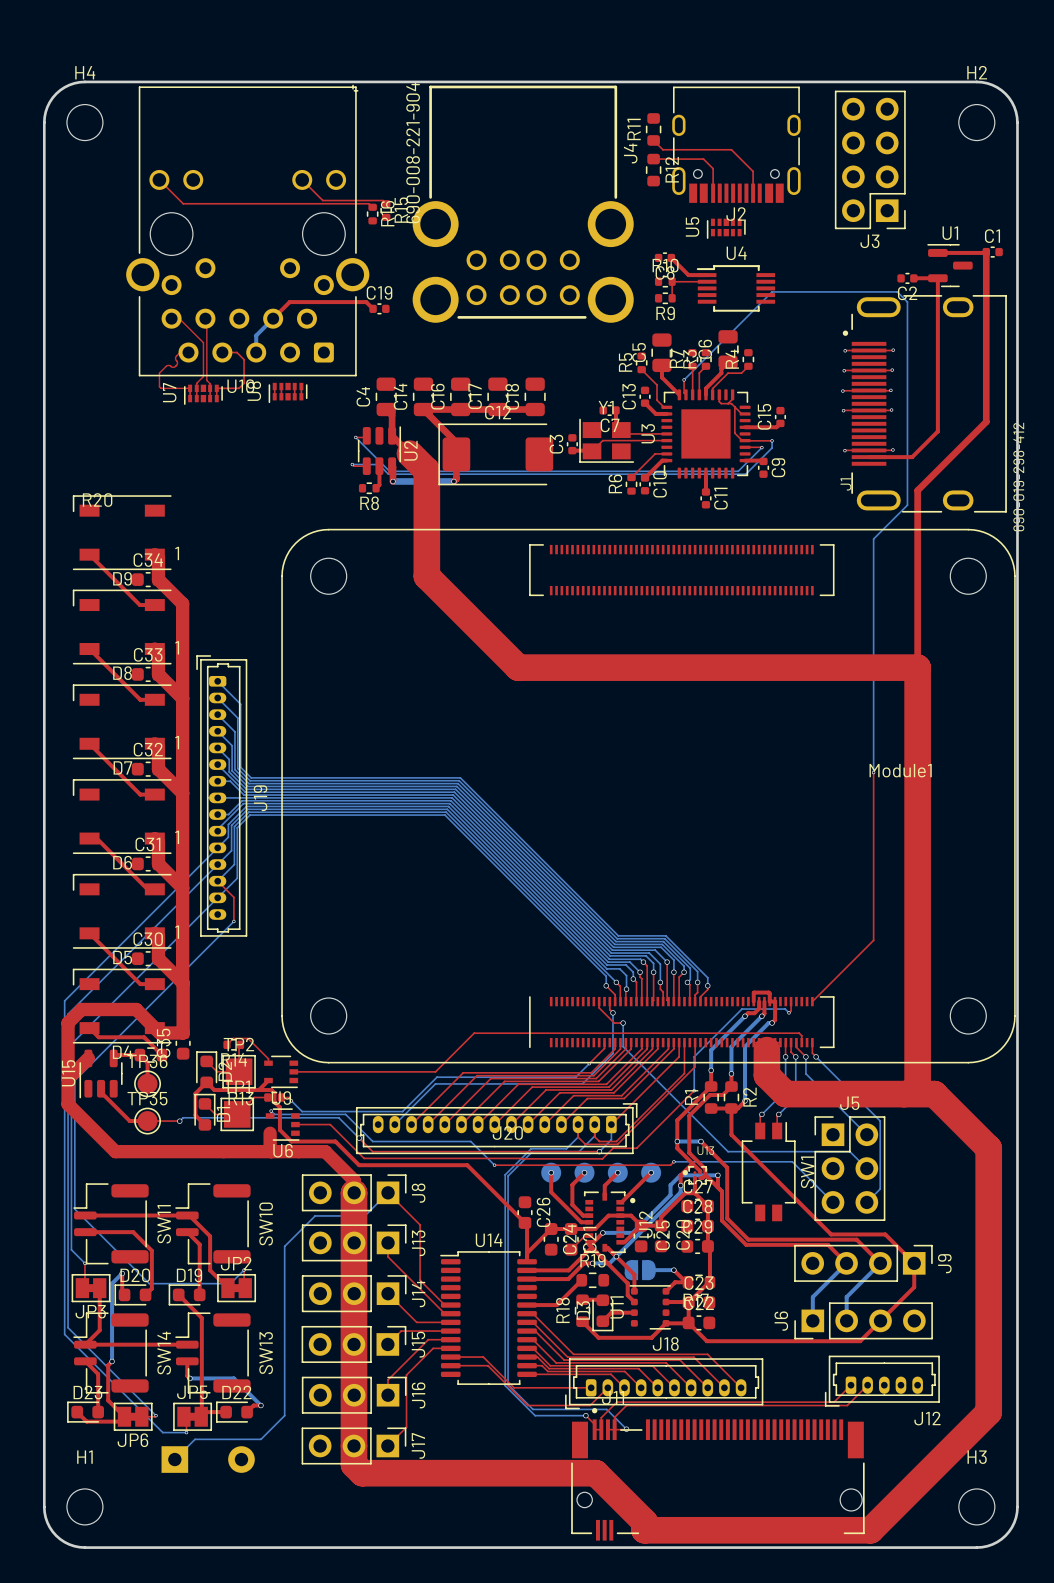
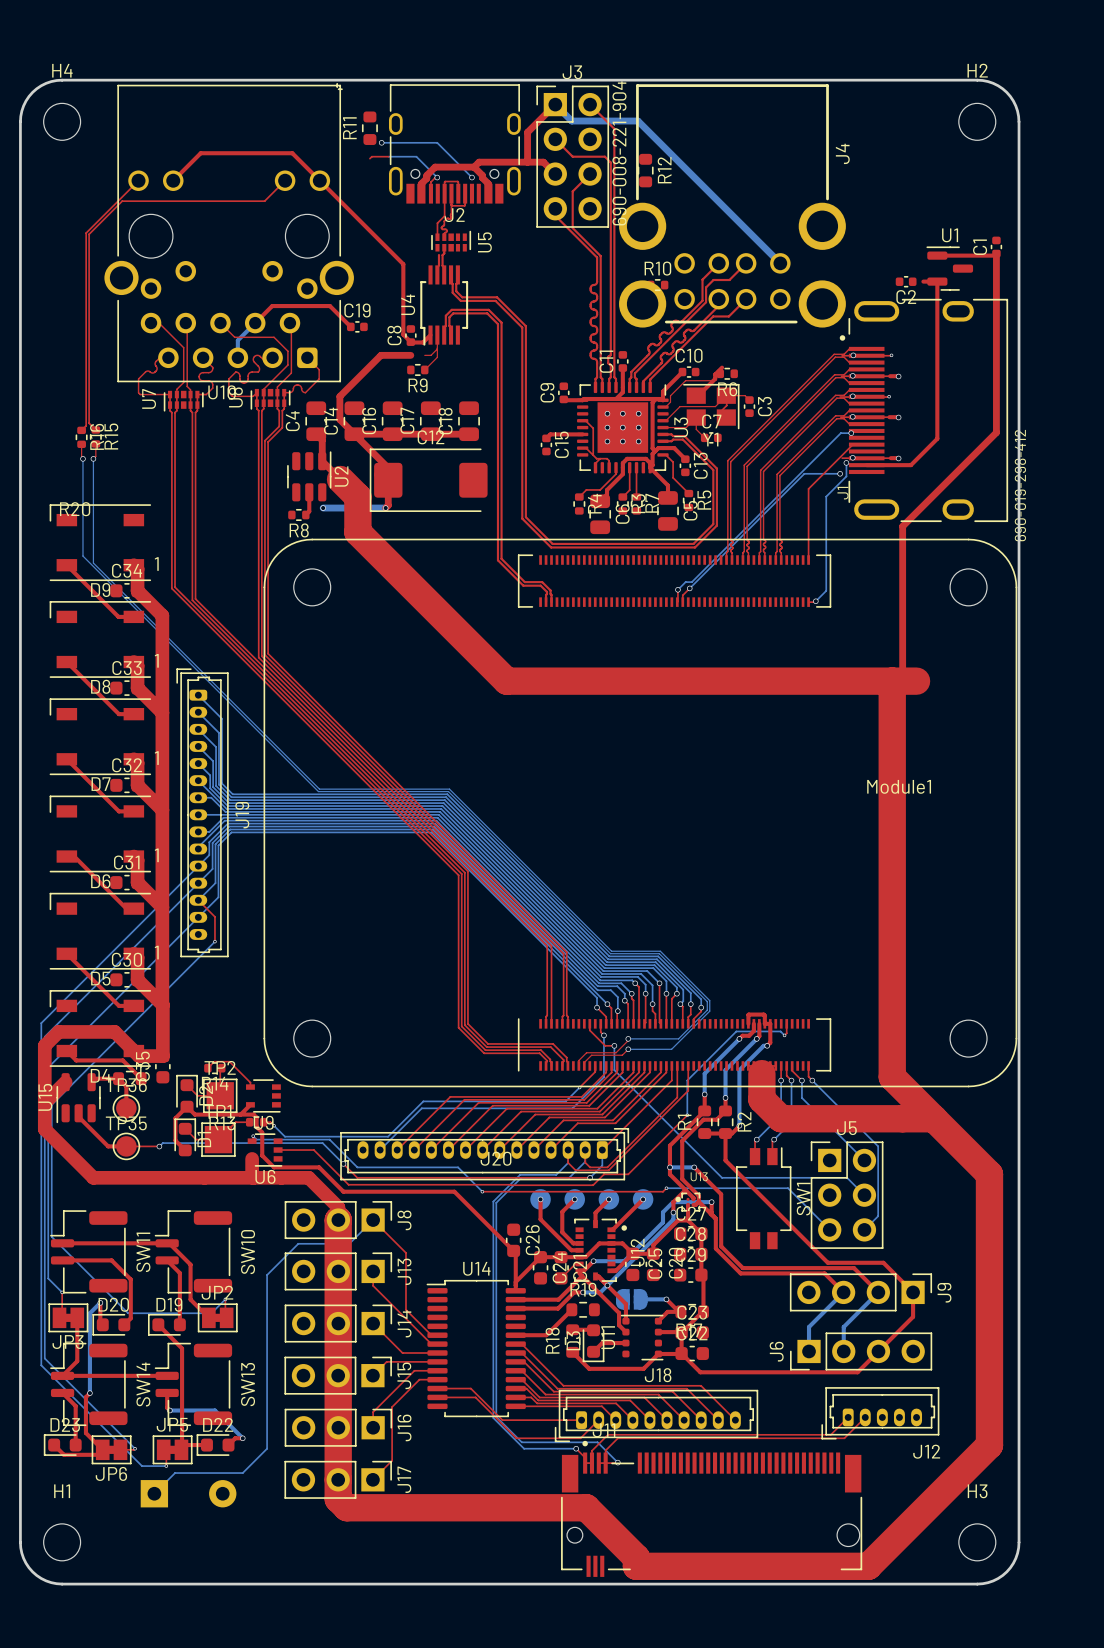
top track: none -> (555, 104) (527, 132) (527, 162)
bottom track: none -> (555, 104) (571, 121) (637, 121) (780, 263)
top track: none -> (590, 104) (614, 128) (614, 377) (616, 387)
R11 position: (653, 129) -> (369, 128)
top track: none -> (555, 139) (572, 156) (604, 156) (610, 162) (610, 354) (608, 357) (608, 363) (610, 365) (610, 377) (609, 387)
top track: (653, 140) (662, 149) (731, 149) (753, 171) (753, 193) -> none
bottom track: none -> (381, 142) (437, 142) (471, 177)
via: none -> (381, 142)
J2 position: (736, 144) -> (454, 143)
top track: none -> (388, 156) (371, 156) (369, 158)
bottom track: none -> (388, 156) (416, 156) (437, 177)
top track: (653, 159) (703, 159) (713, 168) (713, 193) -> none
J3 rotation: 0° (870, 159) -> 180° (572, 156)
J3 position: (870, 159) -> (572, 156)
top track: none -> (474, 167) (479, 162) (543, 162) (555, 174)
top track: none -> (474, 167) (435, 167) (421, 183) (421, 193)
top track: none -> (474, 167) (488, 183) (488, 193)
top track: none -> (590, 174) (572, 191) (572, 228) (600, 256) (600, 377) (602, 387)
top track: none -> (437, 177) (430, 182) (430, 193)
via: none -> (437, 177)
via: none -> (471, 177)
top track: (159, 179) (183, 203) (369, 203) (372, 207) -> (138, 180) (86, 233) (86, 425) (81, 430)
top track: none -> (173, 180) (200, 153) (292, 153) (403, 264) (403, 334) (411, 342) (423, 342) (430, 335)
top track: (302, 179) (322, 200) (382, 200) (386, 203) -> (285, 180) (264, 201) (122, 201) (89, 234) (89, 423) (95, 430)
top track: none -> (451, 193) (451, 217) (446, 218) (441, 227) (447, 230) (444, 237)
top track: none -> (458, 193) (457, 181) (444, 182) (444, 216) (437, 223) (437, 237)
top track: none -> (465, 193) (464, 205) (451, 205)
J4 position: (523, 204) -> (732, 205)
top track: none -> (555, 208) (555, 215) (597, 257) (597, 282) (590, 288) (591, 291) (597, 296) (596, 300) (590, 304) (591, 308) (597, 312) (596, 316) (590, 321) (591, 324) (597, 328) (596, 332) (590, 337) (591, 341) (597, 345) (596, 349) (590, 353) (591, 357) (597, 361) (595, 387)
R15 position: (386, 210) -> (95, 436)
R16 position: (372, 214) -> (81, 437)
U5 rotation: 0° (726, 228) -> 180° (451, 241)
U5 position: (726, 228) -> (451, 241)
top track: none -> (444, 247) (442, 255) (444, 274)
top track: none -> (438, 254) (439, 265)
top track: (985, 252) (986, 421) (917, 490) (917, 1080) (904, 1094) -> (986, 255) (996, 254) (996, 432) (902, 526) (902, 670) (892, 681) (892, 1077) (933, 1118)
C1 rotation: 0° (992, 252) -> 90° clockwise (996, 247)
C8 rotation: 0° (664, 257) -> 90° clockwise (410, 335)
C8 position: (664, 257) -> (410, 335)
top track: (671, 257) (688, 275) (707, 275) -> none
top track: none -> (718, 263) (702, 279) (702, 300) (681, 321) (673, 321) (671, 324) (672, 330) (669, 333) (663, 332) (660, 334) (661, 341) (658, 344) (652, 343) (648, 346) (649, 354) (631, 371) (629, 387)
top track: none -> (746, 263) (729, 280) (713, 280) (706, 287) (706, 302) (634, 373) (636, 387)
top track: none -> (451, 274) (452, 292) (460, 300) (495, 300) (522, 327) (522, 518) (551, 547) (695, 547) (716, 525) (716, 468) (684, 436) (663, 434)
top track: none -> (457, 274) (456, 291) (462, 297) (497, 297) (525, 326) (525, 517) (552, 543) (693, 543) (713, 524) (713, 470) (682, 439) (663, 441)
top track: (915, 278) (924, 278) -> none
top track: (672, 281) (672, 298) -> none
top track: (672, 281) (707, 281) -> none
U4 rotation: 0° (735, 288) -> 90° counterclockwise (444, 305)
U4 position: (735, 288) -> (444, 305)
top track: none -> (718, 299) (718, 305) (694, 330) (687, 329) (684, 332) (685, 338) (682, 341) (676, 341) (672, 344) (673, 350) (671, 353) (664, 352) (661, 355) (661, 362) (643, 381) (643, 387)
top track: none -> (746, 299) (728, 316) (713, 316) (650, 379) (650, 387)
R9 position: (665, 298) -> (417, 369)
top track: (345, 302) (366, 302) (373, 308) -> (329, 306) (350, 326)
C19 position: (379, 308) -> (357, 326)
top track: none -> (220, 323) (234, 337) (274, 337) (287, 351) (287, 365) (263, 389) (263, 392)
top track: none -> (289, 323) (291, 373) (277, 387) (277, 392)
top track: none -> (437, 335) (437, 357) (424, 369)
top track: none -> (444, 335) (445, 315) (451, 309) (488, 309) (501, 322) (501, 558) (524, 582) (542, 582) (550, 590) (551, 602)
top track: none -> (451, 335) (449, 317) (453, 313) (487, 313) (497, 324) (497, 560) (523, 585) (540, 585) (547, 591) (546, 602)
top track: none -> (437, 349) (431, 355) (424, 355)
top track: none -> (876, 348) (849, 348) (844, 354) (834, 354) (727, 460) (726, 560)
C6 name position: C6 (705, 349) -> C6 (622, 514)
C6 position: (728, 349) -> (600, 514)
top track: none -> (410, 355) (380, 355) (339, 396) (339, 419) (388, 468) (388, 505) (385, 508)
via: (845, 350) -> none
via: none -> (853, 355)
top track: (222, 352) (236, 352) (244, 359) (244, 383) (239, 388) (225, 388) -> (203, 357) (212, 367) (210, 372) (202, 372) (199, 375) (201, 380) (209, 381) (212, 383) (212, 388) (206, 394)
top track: none -> (272, 357) (266, 361) (259, 355) (254, 356) (253, 360) (259, 370) (249, 373) (245, 382) (240, 381) (239, 374) (236, 372) (228, 378) (228, 392) (232, 396) (253, 396) (256, 392)
top track: none -> (307, 357) (319, 369) (319, 378) (305, 392) (297, 384) (294, 386) (291, 392) (284, 392)
C5 name position: C5 (639, 352) -> C5 (690, 510)
C5 position: (661, 352) -> (667, 510)
top track: none -> (876, 362) (849, 362) (844, 357) (835, 357) (730, 461) (732, 560)
R7 name position: R7 (676, 358) -> R7 (652, 503)
R3 name position: R3 (689, 359) -> R3 (638, 503)
R7 position: (692, 359) -> (636, 503)
R3 position: (705, 359) -> (622, 503)
R4 name position: R4 (732, 359) -> R4 (594, 503)
R4 position: (748, 359) -> (579, 503)
R5 name position: R5 (625, 362) -> R5 (704, 500)
top track: none -> (622, 368) (622, 392) (616, 399)
R5 position: (641, 362) -> (688, 500)
top track: none -> (876, 369) (849, 369) (844, 374) (834, 374) (744, 465) (742, 560)
top track: (661, 365) (661, 377) (679, 394) -> none
top track: none -> (682, 372) (663, 391) (663, 400) (563, 399)
top track: (692, 366) (692, 394) -> none
top track: (705, 366) (699, 372) (699, 394) -> none
top track: (748, 366) (741, 373) (728, 373) (712, 388) (712, 394) -> none
top track: (641, 369) (656, 385) (656, 400) (664, 407) (666, 407) -> none
via: (844, 370) -> none
via: none -> (852, 375)
top track: none -> (890, 376) (898, 376)
via: (892, 370) -> none
via: none -> (898, 376)
top track: none -> (713, 380) (685, 380) (670, 395) (670, 402) (663, 407)
top track: none -> (876, 383) (849, 383) (844, 377) (835, 377) (747, 466) (748, 560)
top track: (684, 379) (684, 392) (685, 394) -> none
bottom track: (684, 379) (772, 291) (897, 291) (907, 302) (907, 505) (873, 539) (873, 772) -> none
via: (684, 379) -> none
top track: none -> (876, 389) (849, 389) (844, 395) (835, 395) (760, 470) (759, 560)
via: none -> (852, 396)
via: (842, 391) -> none
top track: none -> (656, 399) (652, 402) (652, 448) (655, 451)
top track: none -> (749, 400) (745, 395) (726, 395) (715, 406) (680, 406) (665, 420) (663, 420)
top track: (719, 394) (719, 401) (721, 403) (731, 403) (741, 413) (745, 413) -> none
top track: none -> (256, 403) (258, 410) (258, 657) (547, 946) (546, 1023)
top track: none -> (263, 403) (261, 410) (261, 656) (551, 945) (551, 1023)
top track: none -> (277, 403) (279, 426) (264, 440) (264, 654) (563, 953) (562, 1023)
top track: none -> (284, 403) (282, 427) (268, 442) (268, 653) (566, 952) (567, 1023)
C4 position: (386, 396) -> (316, 421)
C14 position: (423, 396) -> (354, 421)
C16 position: (460, 396) -> (392, 421)
C17 position: (497, 396) -> (430, 421)
C18 position: (535, 396) -> (469, 421)
C13 name position: C13 (629, 396) -> C13 (700, 465)
C13 position: (645, 396) -> (685, 465)
top track: none -> (876, 403) (849, 403) (844, 398) (836, 398) (763, 471) (764, 560)
top track: none -> (170, 405) (171, 412) (171, 588) (458, 875) (458, 1027) (484, 1053) (539, 1053) (547, 1060) (546, 1065)
top track: none -> (176, 405) (175, 412) (175, 587) (461, 873) (461, 1026) (485, 1050) (540, 1050) (550, 1059) (551, 1065)
top track: none -> (190, 405) (192, 412) (192, 600) (464, 872) (464, 1025) (486, 1047) (550, 1047) (563, 1059) (562, 1065)
top track: none -> (197, 405) (195, 412) (195, 598) (467, 871) (467, 1023) (488, 1043) (553, 1043) (566, 1057) (567, 1065)
top track: (645, 403) (655, 413) (666, 413) -> none
top track: none -> (876, 410) (849, 410) (844, 415) (835, 415) (777, 474) (775, 560)
via: none -> (607, 413)
via: none -> (622, 413)
via: none -> (638, 413)
top track: (734, 407) (734, 433) (742, 440) (772, 440) -> none
top track: (386, 409) (392, 415) (392, 435) (426, 470) (426, 576) -> (316, 434) (322, 440) (322, 461) (357, 496) (357, 532) (412, 587)
top track: (535, 409) (423, 409) (456, 442) (456, 478) (453, 481) -> none
C7 position: (609, 410) -> (711, 437)
top track: (616, 410) (616, 424) (625, 433) (666, 433) -> none
via: (843, 410) -> none
via: none -> (852, 416)
top track: none -> (889, 417) (898, 417)
via: (891, 410) -> none
via: none -> (898, 417)
top track: none -> (582, 420) (585, 420) (593, 428) (593, 455)
C15 name position: C15 (764, 416) -> C15 (561, 444)
C15 position: (780, 417) -> (546, 444)
top track: none -> (876, 424) (849, 424) (844, 418) (836, 418) (779, 475) (781, 560)
via: none -> (607, 427)
via: none -> (622, 427)
via: none -> (638, 427)
top track: none -> (663, 427) (686, 427) (696, 417) (696, 429) (704, 437)
top track: (780, 423) (776, 427) (745, 427) -> none
C7 name position: C7 (610, 425) -> C7 (711, 421)
bottom track: none -> (851, 433) (840, 433) (691, 582) (685, 582) (677, 589)
via: none -> (851, 433)
top track: none -> (354, 434) (469, 434)
top track: none -> (582, 434) (550, 434) (546, 438)
U3 rotation: 0° (705, 433) -> 180° (622, 427)
U3 position: (705, 433) -> (622, 427)
via: none -> (607, 441)
via: none -> (622, 441)
via: none -> (638, 441)
top track: (366, 435) (355, 437) -> none
top track: none -> (81, 444) (82, 458)
top track: none -> (95, 443) (95, 456) (93, 458)
bottom track: (355, 437) (389, 471) (738, 471) (761, 447) -> none
via: (355, 437) -> none
top track: none -> (876, 444) (852, 444) (808, 488) (808, 560)
top track: none -> (582, 448) (586, 448) (596, 458) (607, 458) (609, 460) (609, 467)
Y1 rotation: 0° (606, 440) -> 180° (711, 406)
Y1 position: (606, 440) -> (711, 406)
top track: (666, 440) (602, 440) (592, 451) (572, 450) -> none
bottom track: (772, 440) (772, 447) (745, 474) (388, 474) (378, 464) (352, 464) -> none
via: (772, 440) -> none
C3 name position: C3 (556, 444) -> C3 (764, 406)
C3 position: (572, 444) -> (749, 406)
top track: none -> (663, 454) (665, 454) (673, 462) (673, 477) (688, 493)
top track: (745, 447) (761, 447) -> none
via: (761, 447) -> none
via: none -> (852, 457)
via: (892, 449) -> none
U2 position: (379, 450) -> (309, 476)
top track: none -> (600, 458) (595, 463) (595, 467)
via: (844, 450) -> none
top track: none -> (890, 458) (898, 458)
via: none -> (898, 458)
bottom track: none -> (82, 458) (82, 556) (318, 791) (448, 791) (610, 953) (659, 953) (707, 1001) (707, 1010) (678, 1038) (628, 1038)
via: none -> (82, 458)
bottom track: none -> (93, 458) (93, 563) (319, 789) (449, 789) (611, 951) (660, 951) (709, 1000) (709, 1011) (671, 1049) (628, 1049)
via: none -> (93, 458)
top track: none -> (685, 459) (674, 448) (658, 448) (652, 453) (652, 465) (650, 467)
top track: (666, 453) (655, 453) (631, 477) -> none
C12 position: (495, 454) -> (428, 480)
via: none -> (846, 462)
bottom track: none -> (846, 462) (846, 476) (826, 496) (826, 590) (815, 601)
top track: none -> (616, 467) (616, 474) (600, 489) (586, 489) (579, 497)
top track: none -> (629, 467) (629, 490) (622, 497)
top track: none -> (636, 467) (636, 497)
top track: none -> (650, 467) (650, 463) (645, 458) (627, 458) (622, 463) (622, 474) (607, 490) (607, 494) (600, 501)
top track: none -> (650, 467) (667, 485) (667, 497)
top track: (666, 460) (662, 460) (645, 477) -> none
top track: (745, 460) (763, 461) -> none
top track: (352, 464) (366, 466) -> none
via: (352, 464) -> none
bottom track: none -> (840, 473) (804, 473) (689, 588)
via: none -> (840, 473)
top track: (379, 466) (379, 484) (376, 488) -> (309, 492) (309, 511) (305, 514)
C9 position: (763, 467) -> (563, 392)
C9 name position: C9 (778, 467) -> C9 (547, 392)
top track: (705, 473) (705, 492) -> none
bottom track: (392, 481) (453, 481) -> (323, 508) (385, 508)
via position: (392, 481) -> (385, 508)
via: (453, 481) -> none
R6 rotation: 0° (631, 484) -> 90° clockwise (727, 373)
R6 position: (631, 484) -> (727, 373)
C10 rotation: 0° (645, 484) -> 90° clockwise (689, 372)
C10 position: (645, 484) -> (689, 372)
R8 position: (369, 488) -> (298, 514)
via: none -> (323, 508)
C11 position: (705, 498) -> (622, 361)
C11 name position: C11 (720, 498) -> C11 (606, 361)
top track: none -> (689, 588) (682, 595) (682, 602)
via: none -> (689, 588)
top track: none -> (677, 589) (677, 602)
via: none -> (677, 589)
top track: none -> (815, 601) (808, 602)
via: none -> (815, 601)
top track: (873, 772) (873, 940) (812, 1001) -> none
via: (873, 772) -> none
top track: none -> (628, 1038) (616, 1052) (586, 1052) (578, 1060) (578, 1065)
via: none -> (628, 1038)
top track: none -> (628, 1049) (622, 1055) (591, 1055) (584, 1062) (584, 1065)
via: none -> (628, 1049)
top track: (801, 1042) (801, 1035) (799, 1033) (474, 1033) (435, 1071) (293, 1071) -> none

